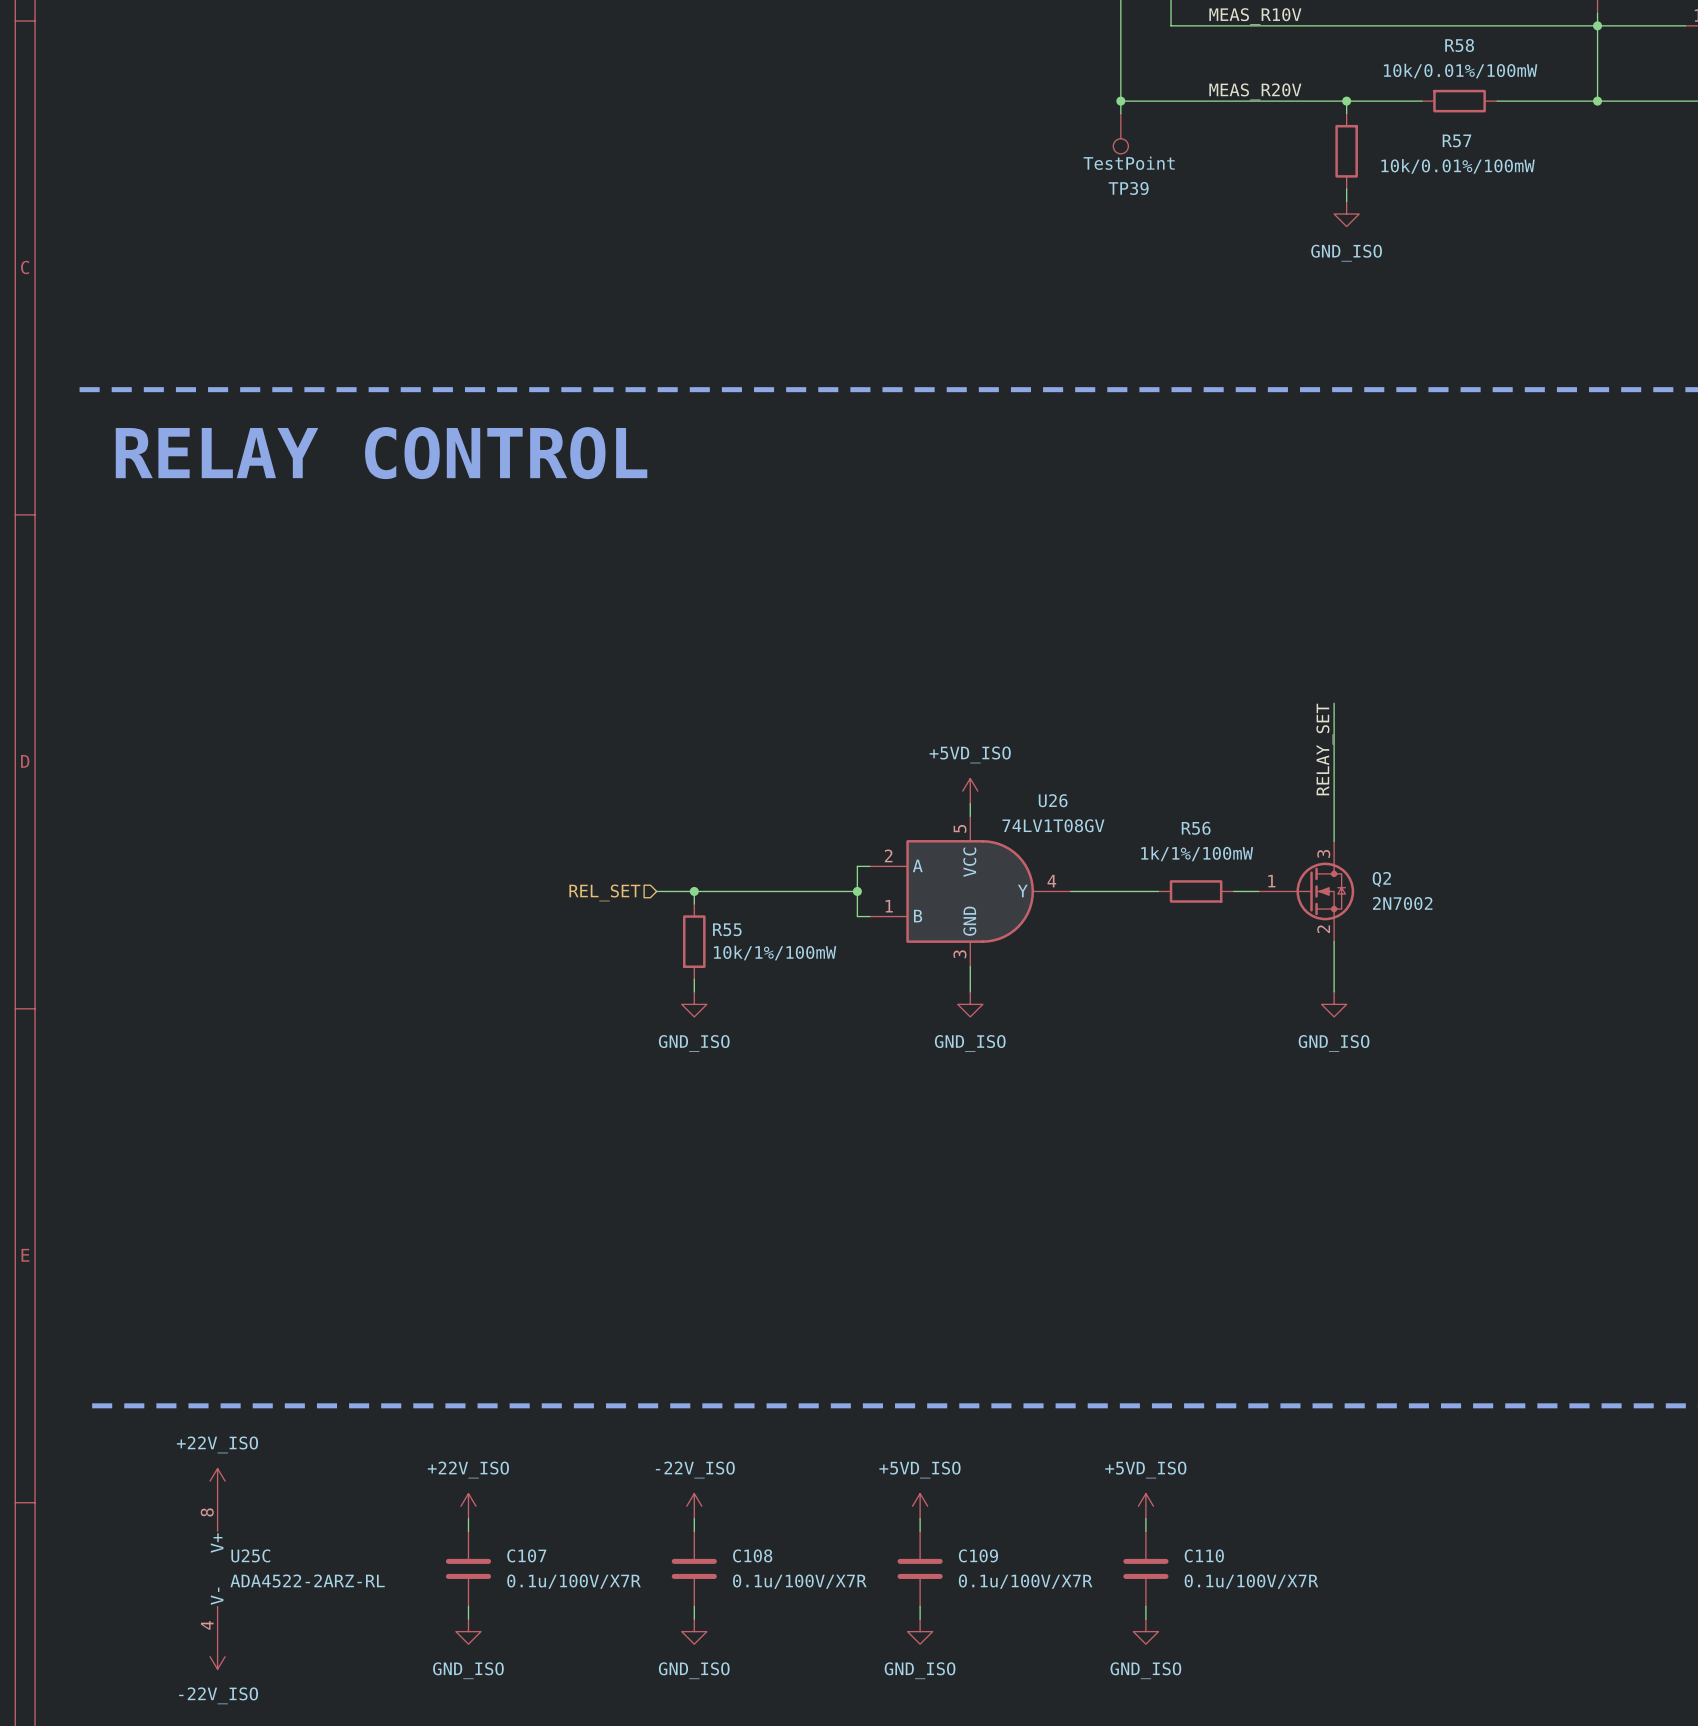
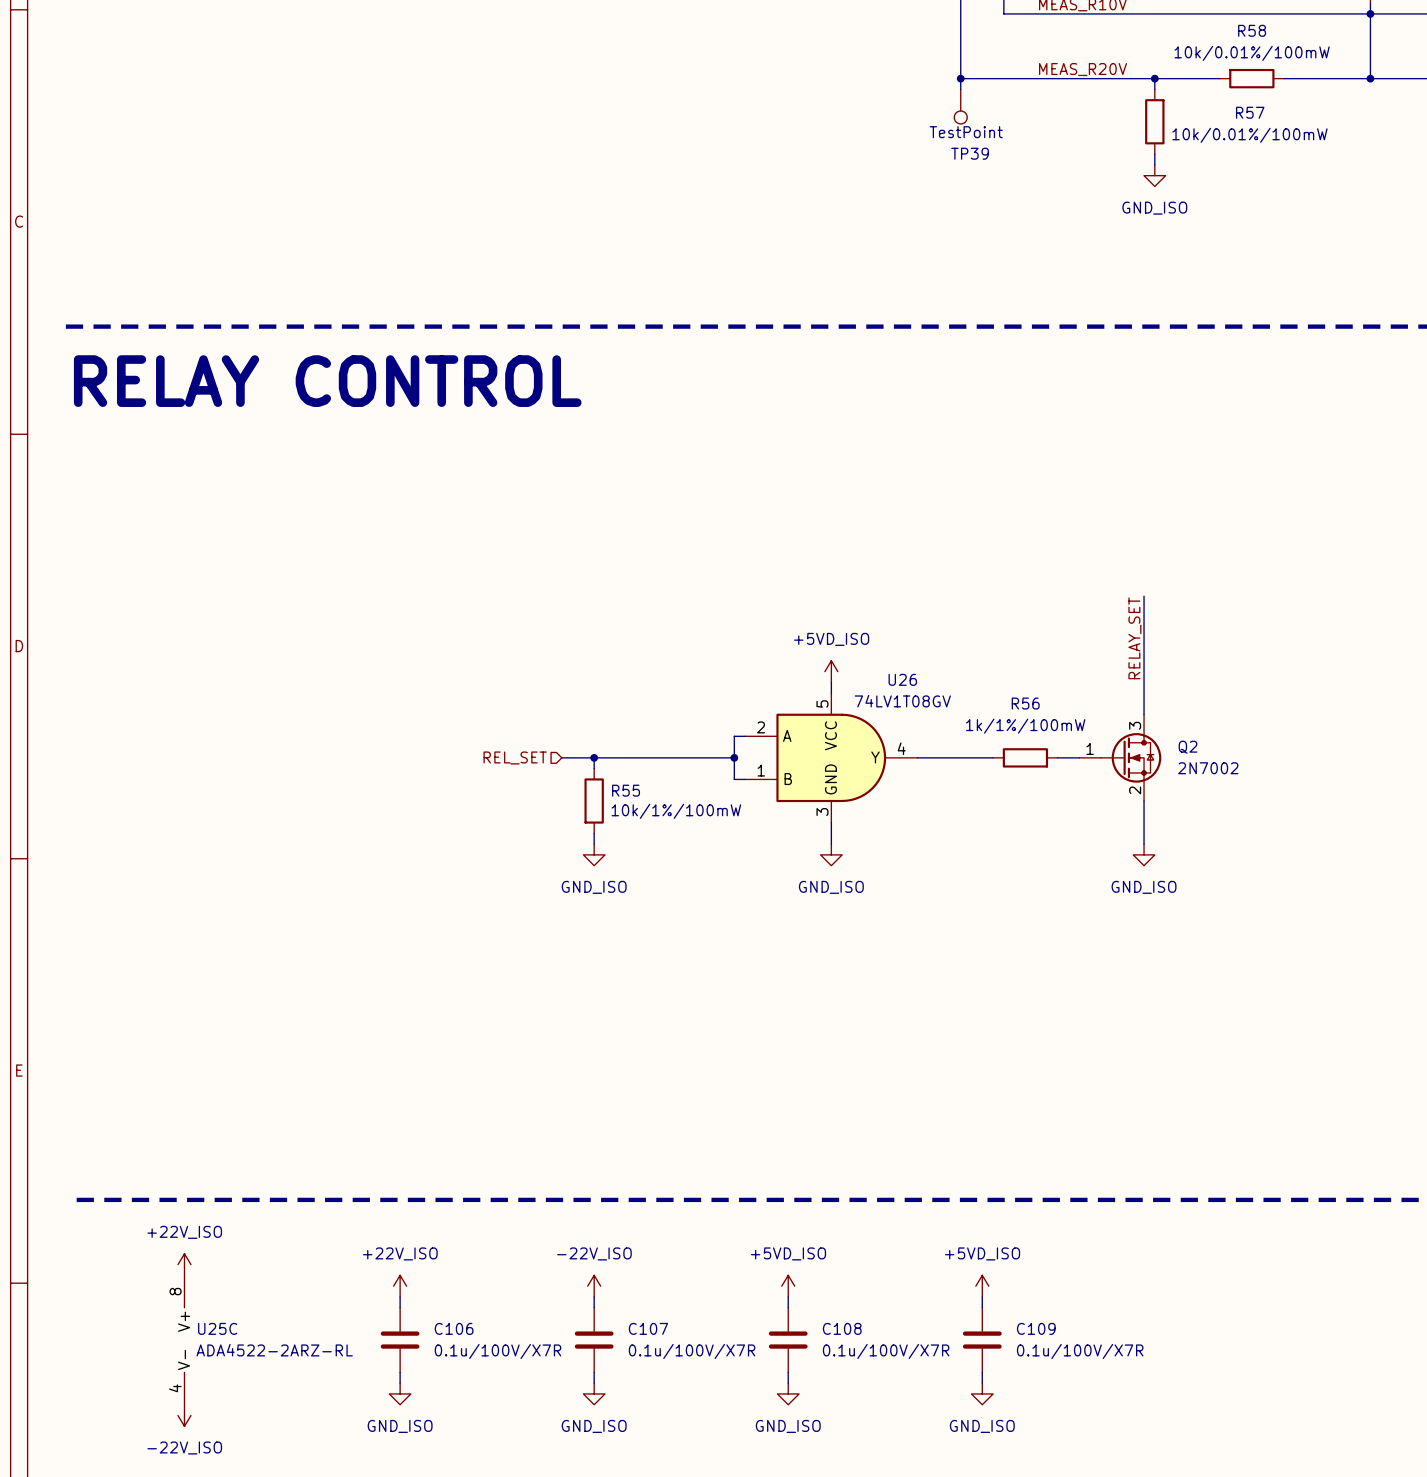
C107 name: C107 (526, 1555) -> C106 (454, 1328)
C108 name: C108 (752, 1555) -> C107 (648, 1328)
C109 name: C109 (978, 1555) -> C108 (842, 1328)
C110 name: C110 (1204, 1555) -> C109 (1036, 1328)

